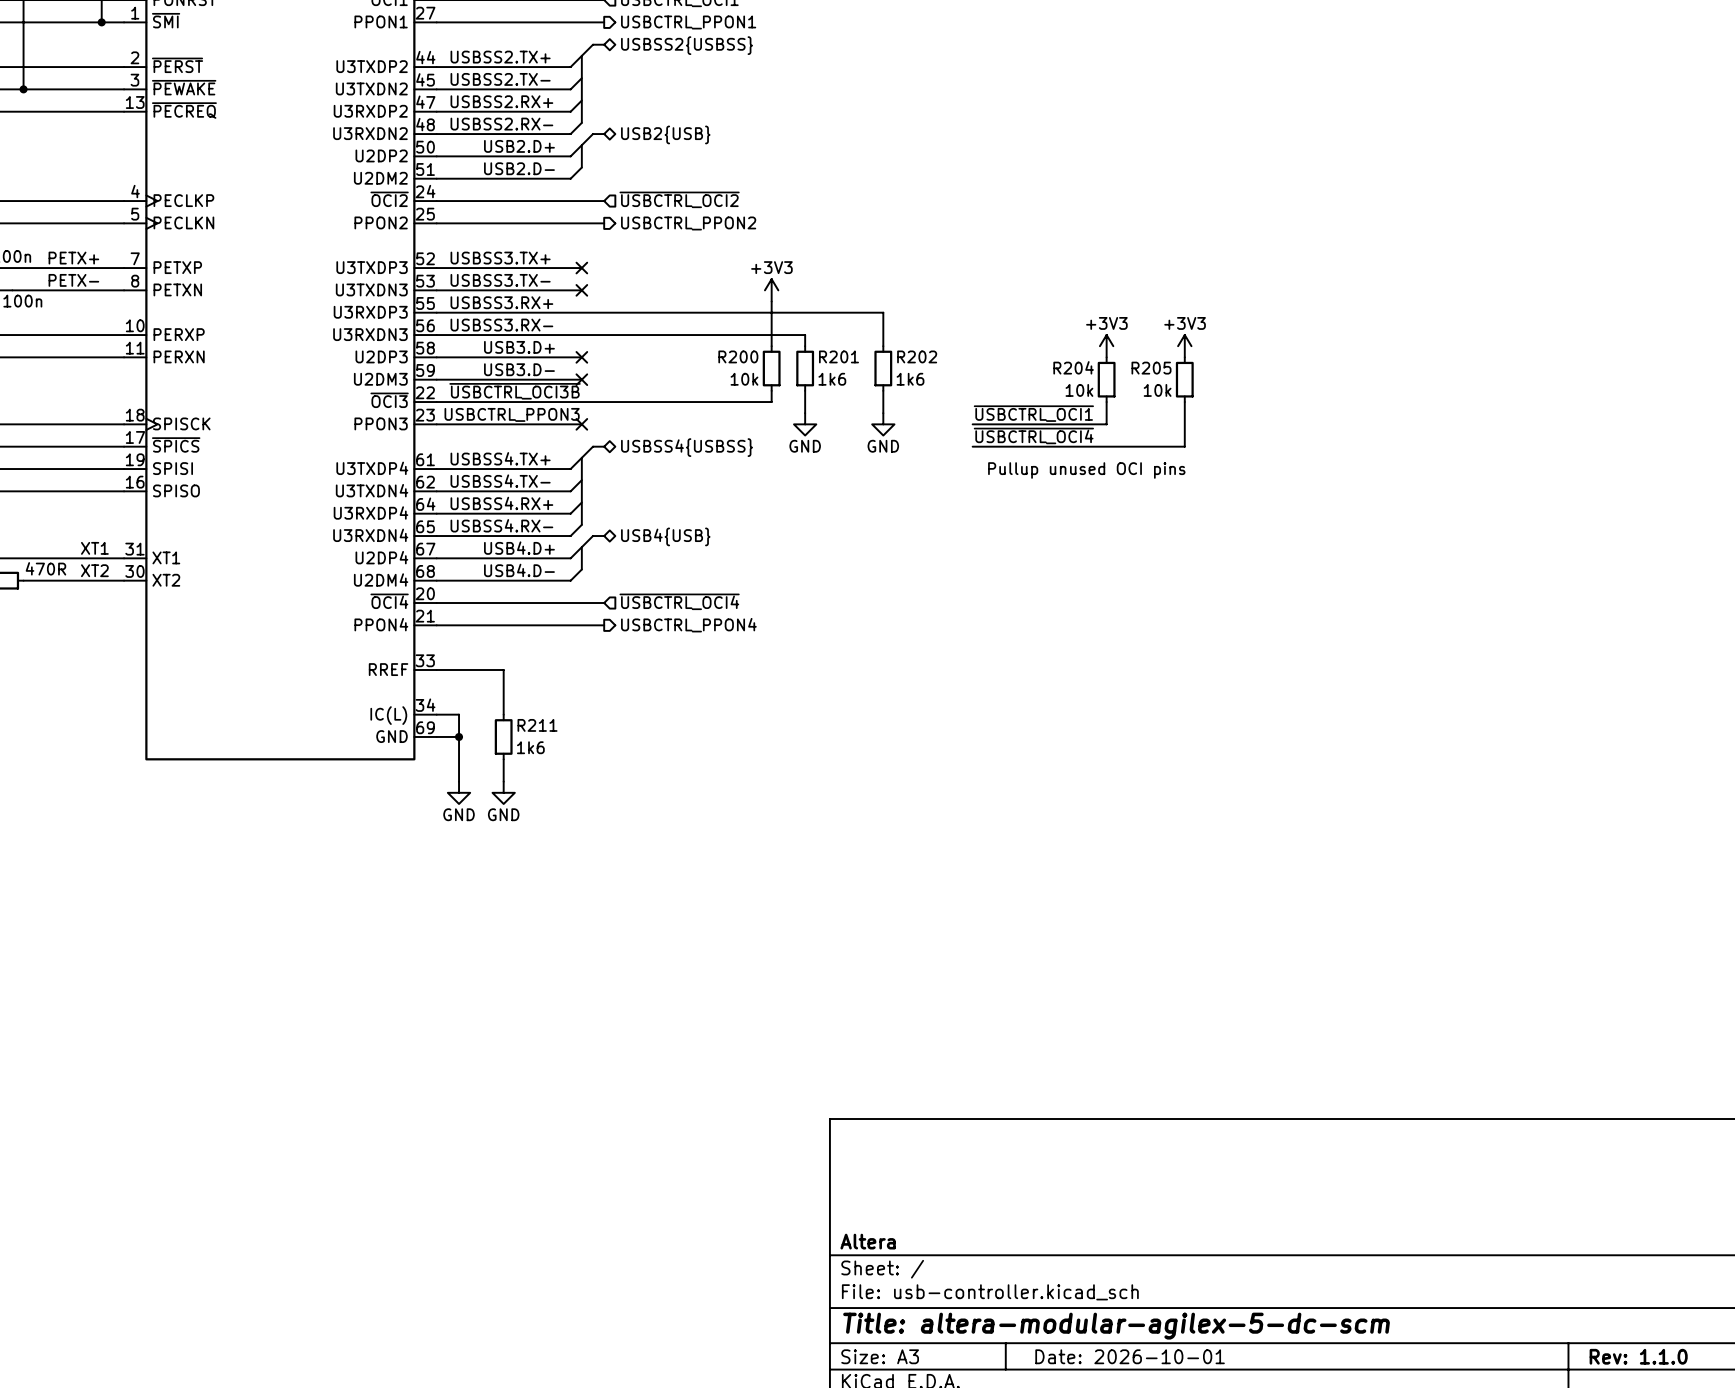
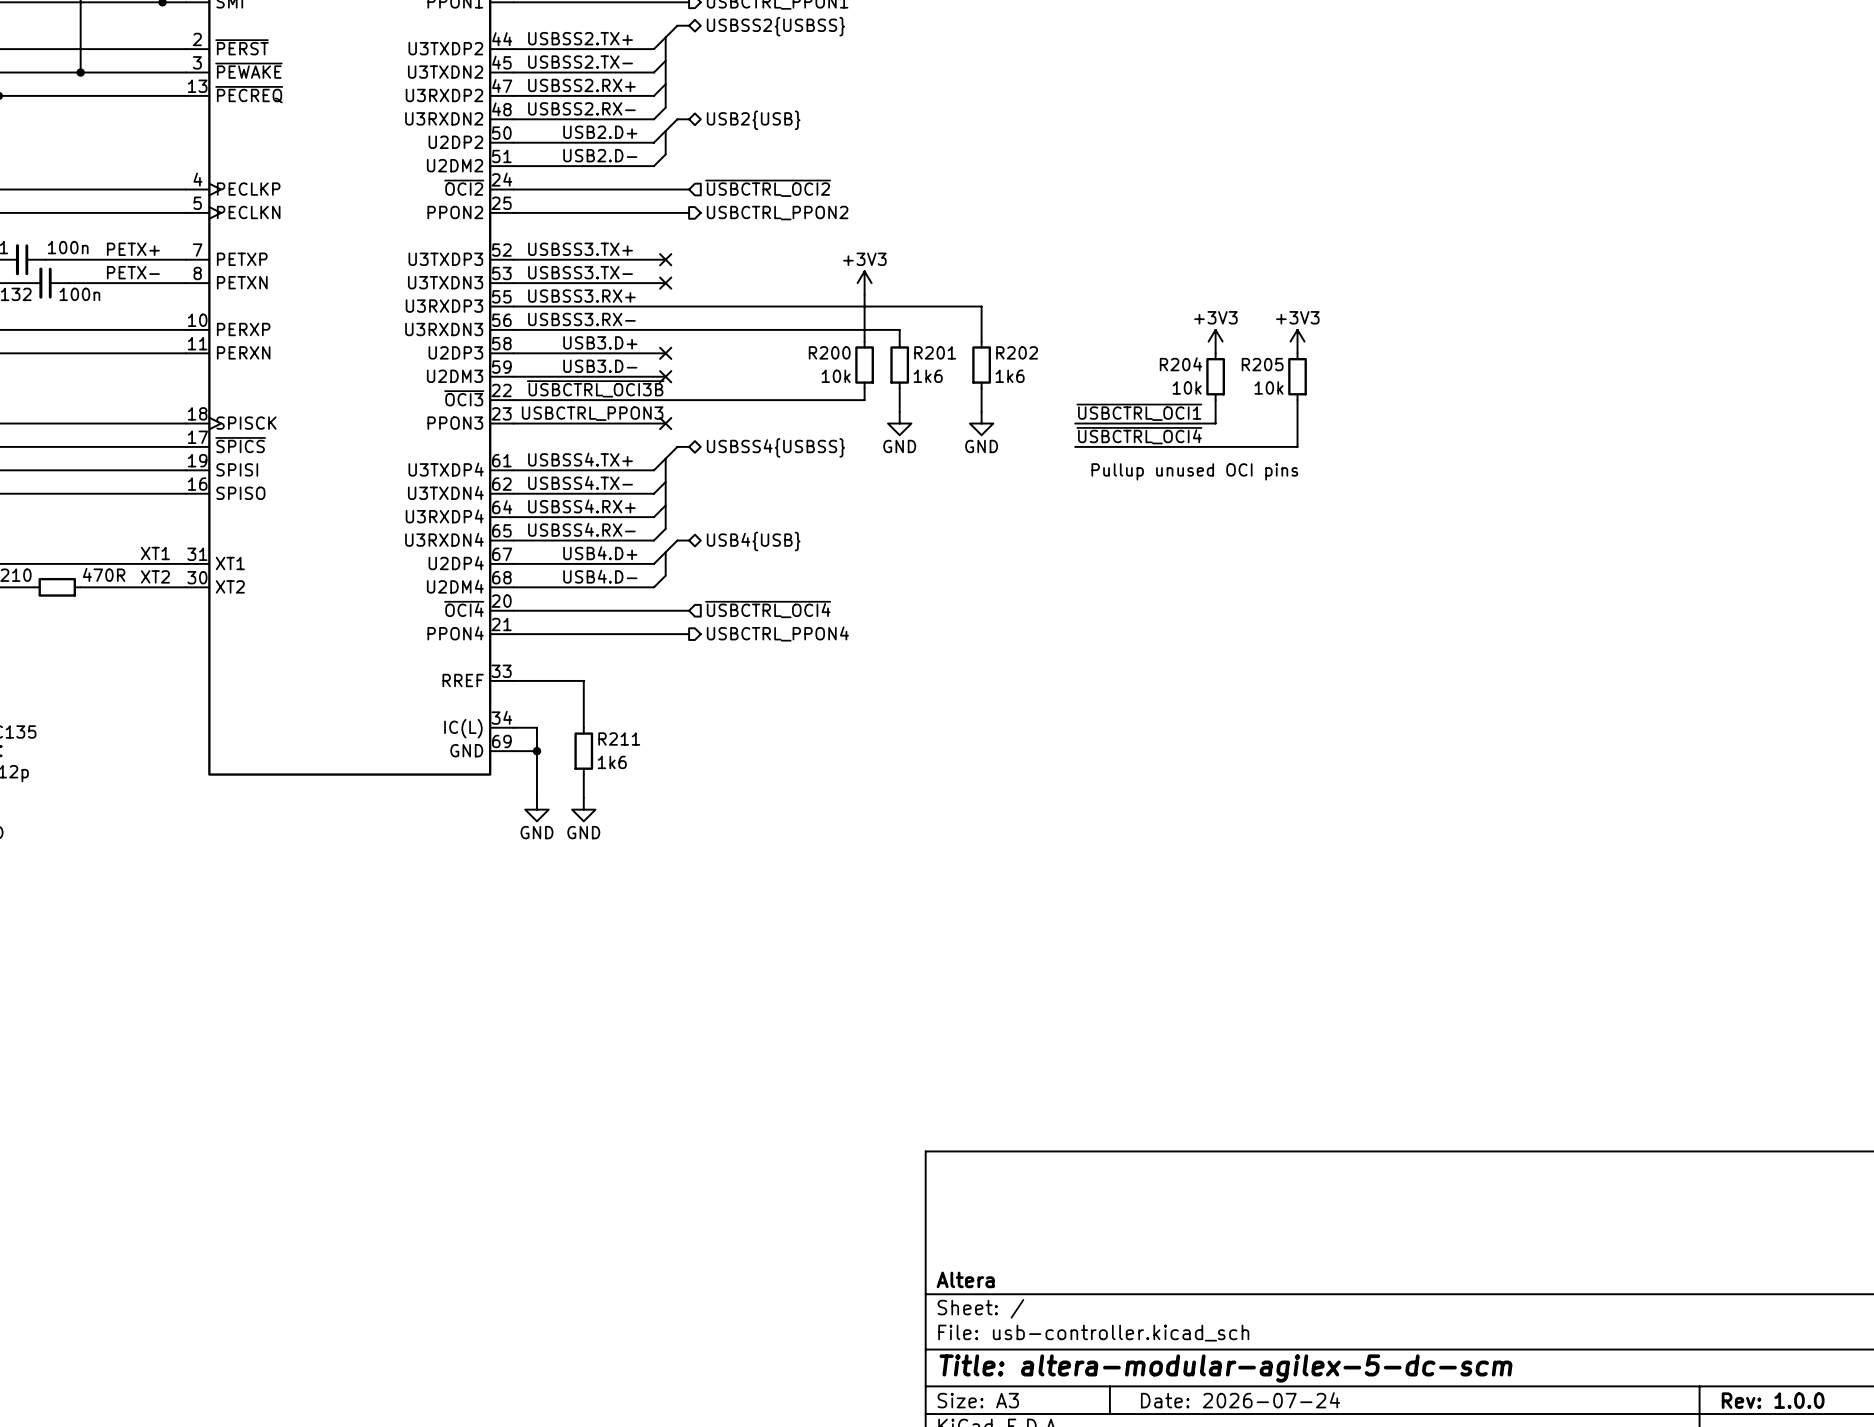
title block: Date: 2026-10-01 (1130, 1356) -> Date: 2026-07-24 (1240, 1400)
title block: Rev: 1.1.0 (1638, 1356) -> Rev: 1.0.0 (1773, 1400)

